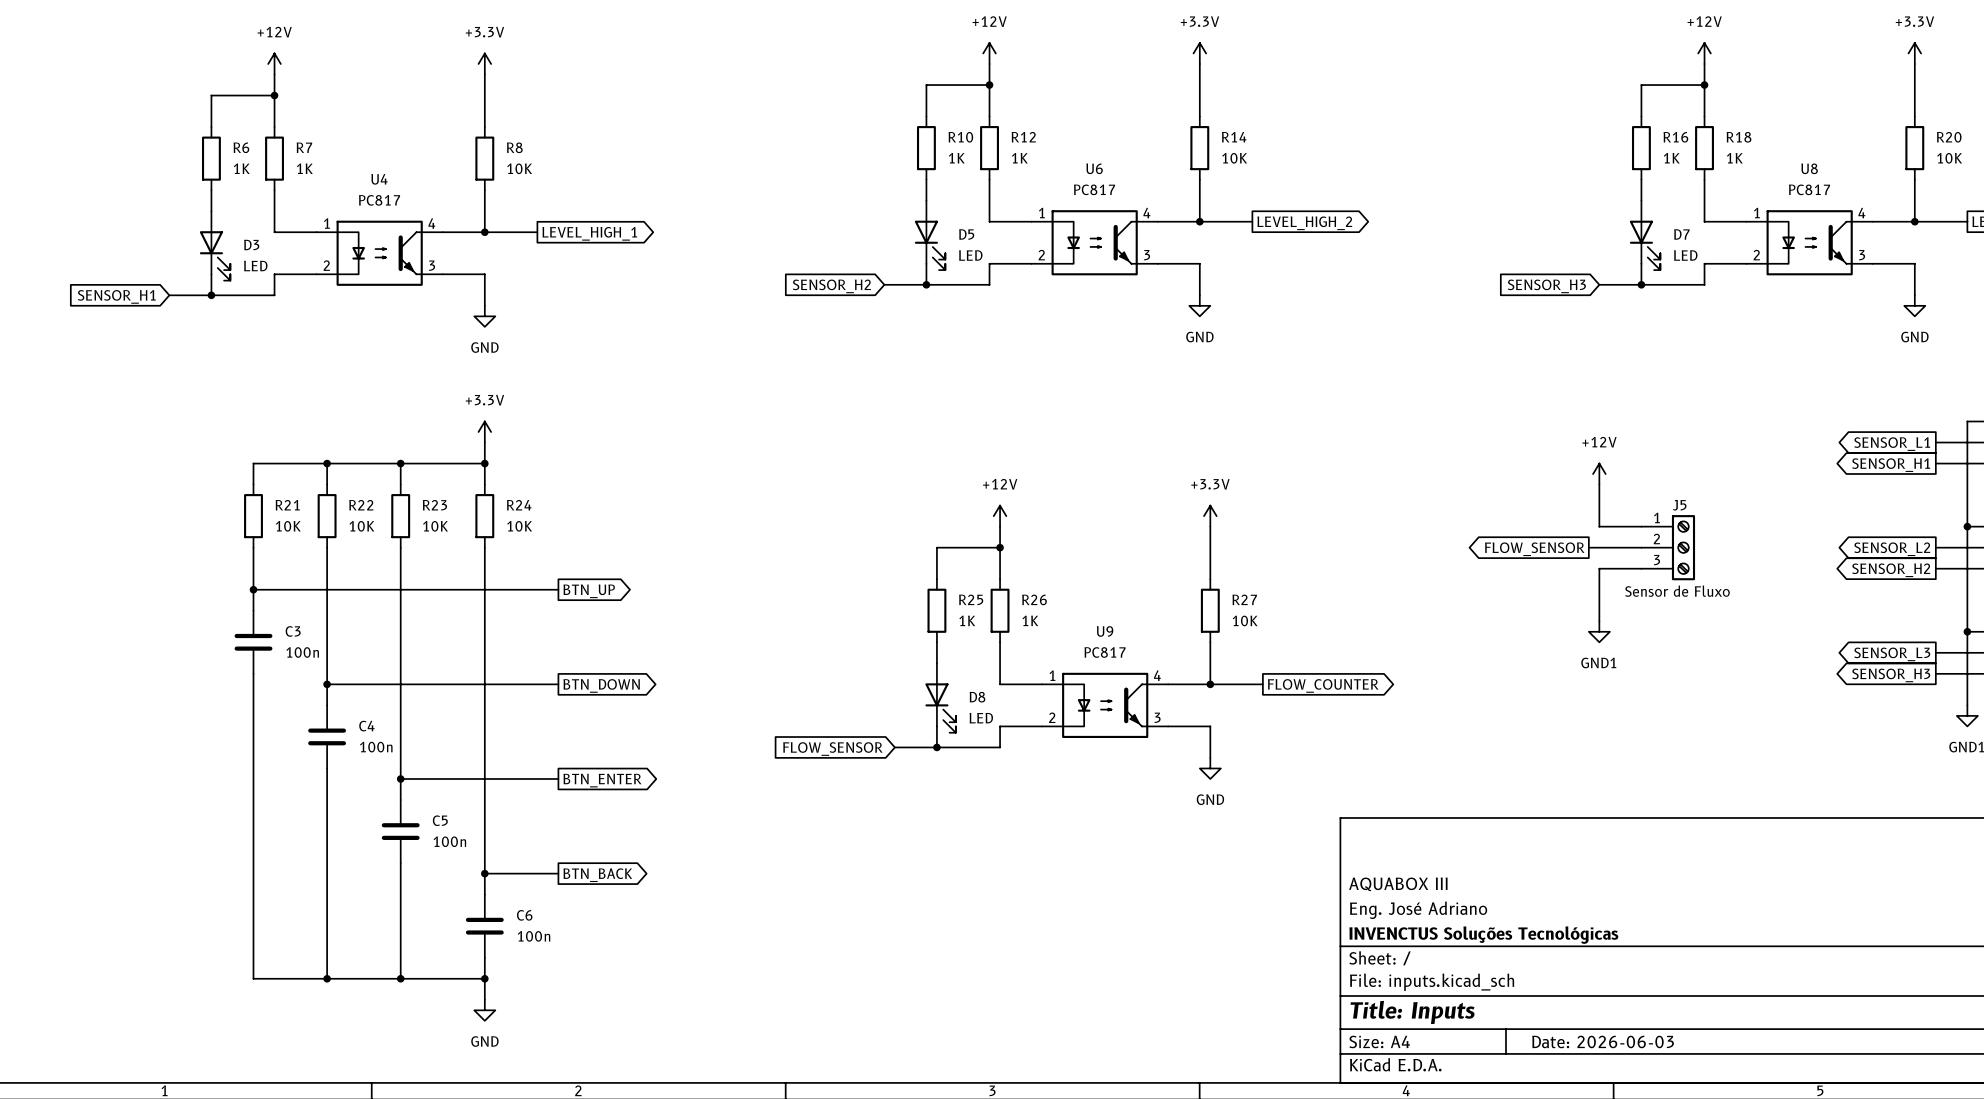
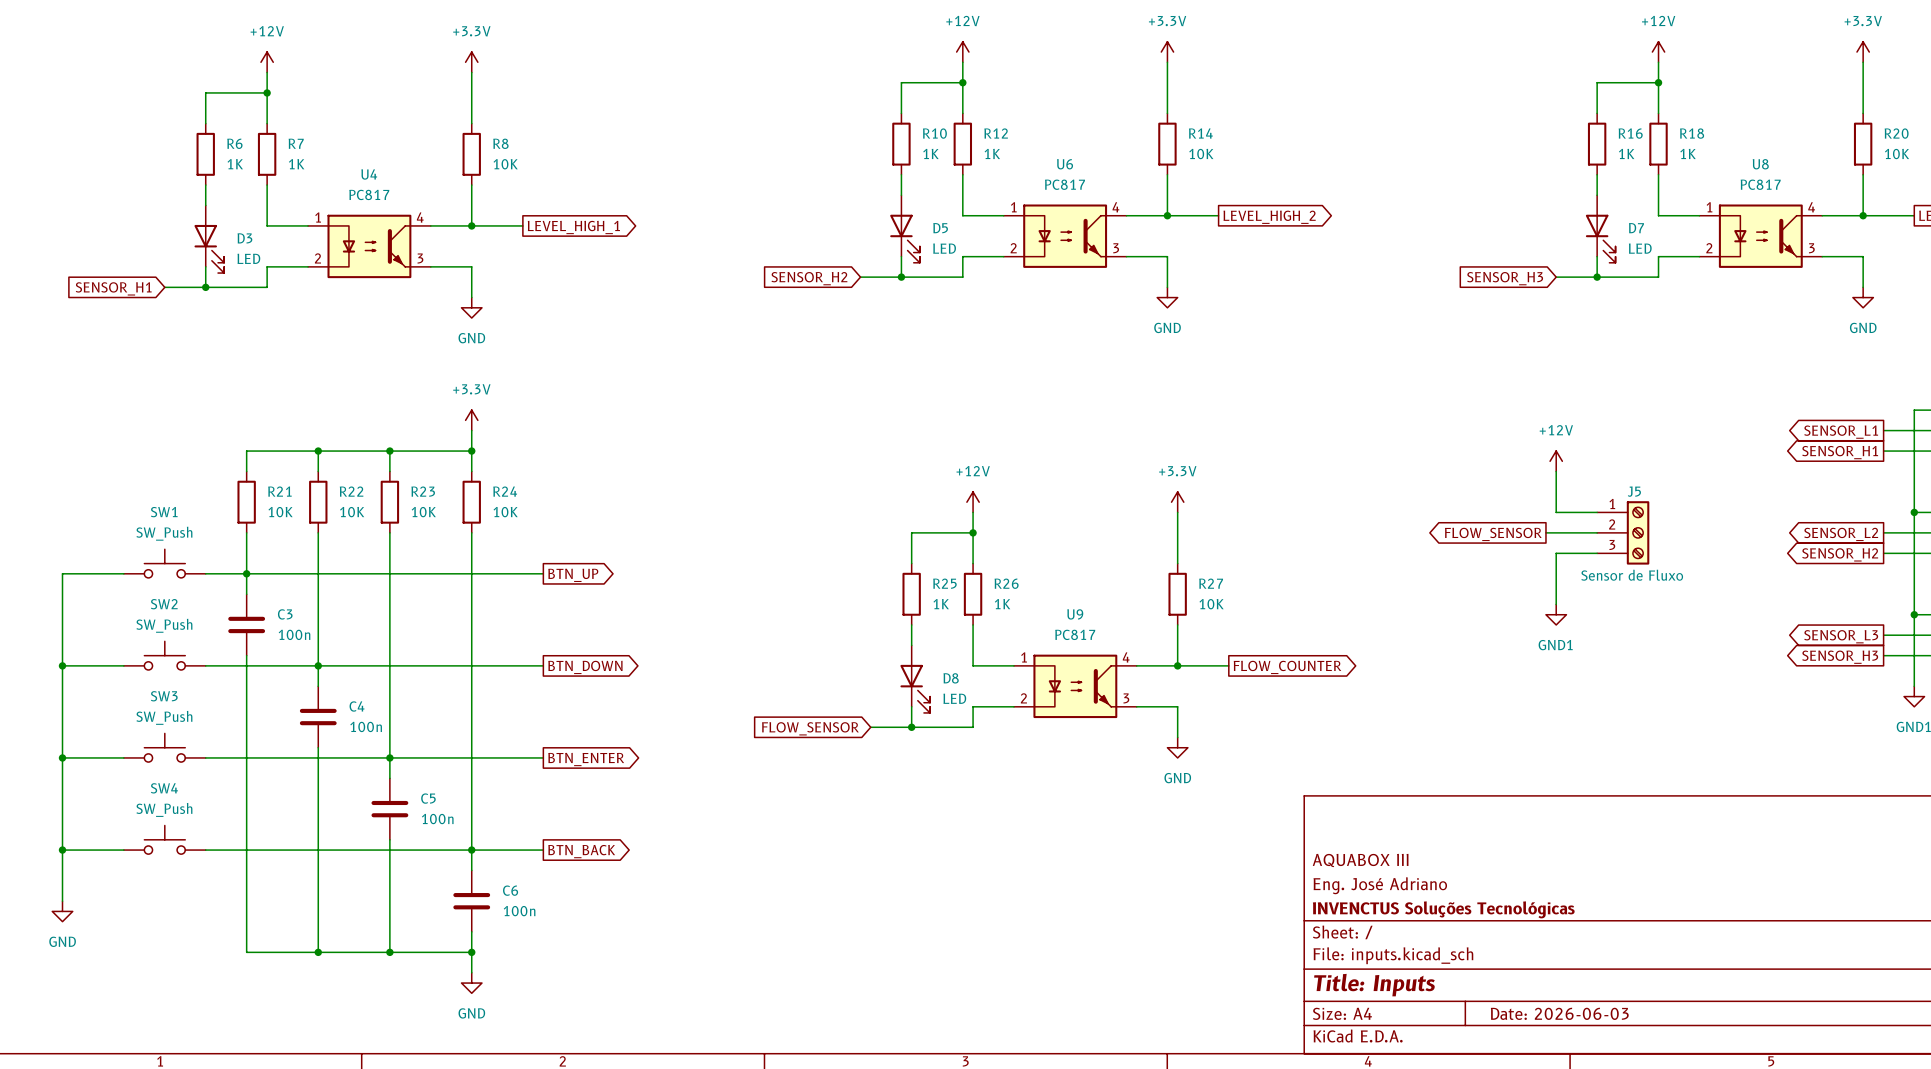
SW1: none -> SW_Push (164, 563)
wire: none -> (123, 573) (62, 573) (62, 901)
wire: none -> (205, 573) (246, 573)
SW2: none -> SW_Push (164, 655)
wire: none -> (62, 665) (123, 665)
junction: none -> (62, 665)
wire: none -> (205, 665) (318, 665)
SW3: none -> SW_Push (164, 747)
wire: none -> (62, 757) (123, 757)
junction: none -> (62, 757)
wire: none -> (205, 757) (389, 757)
SW4: none -> SW_Push (164, 839)
wire: none -> (62, 850) (123, 850)
junction: none -> (62, 850)
wire: none -> (205, 850) (471, 850)
power symbol: none -> GND (62, 911)

